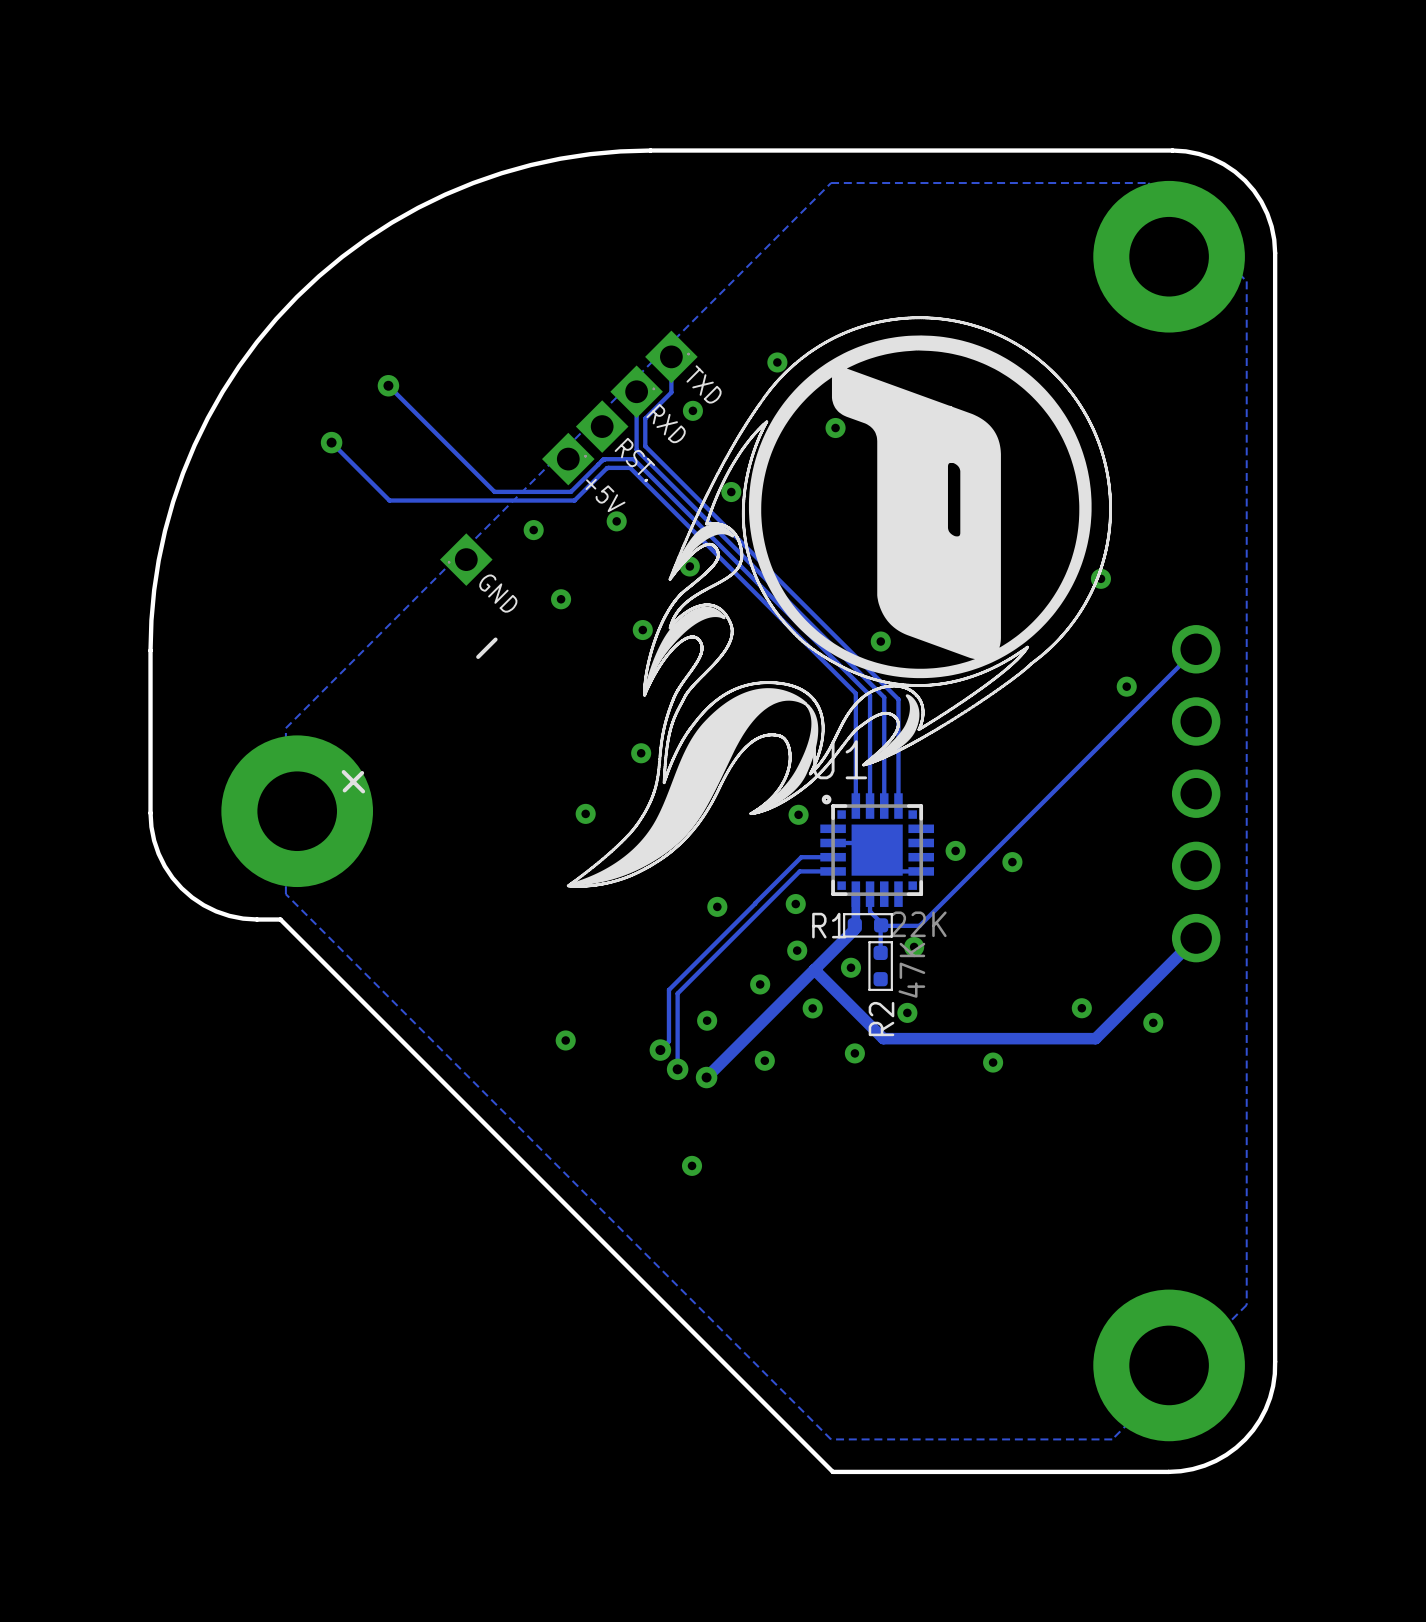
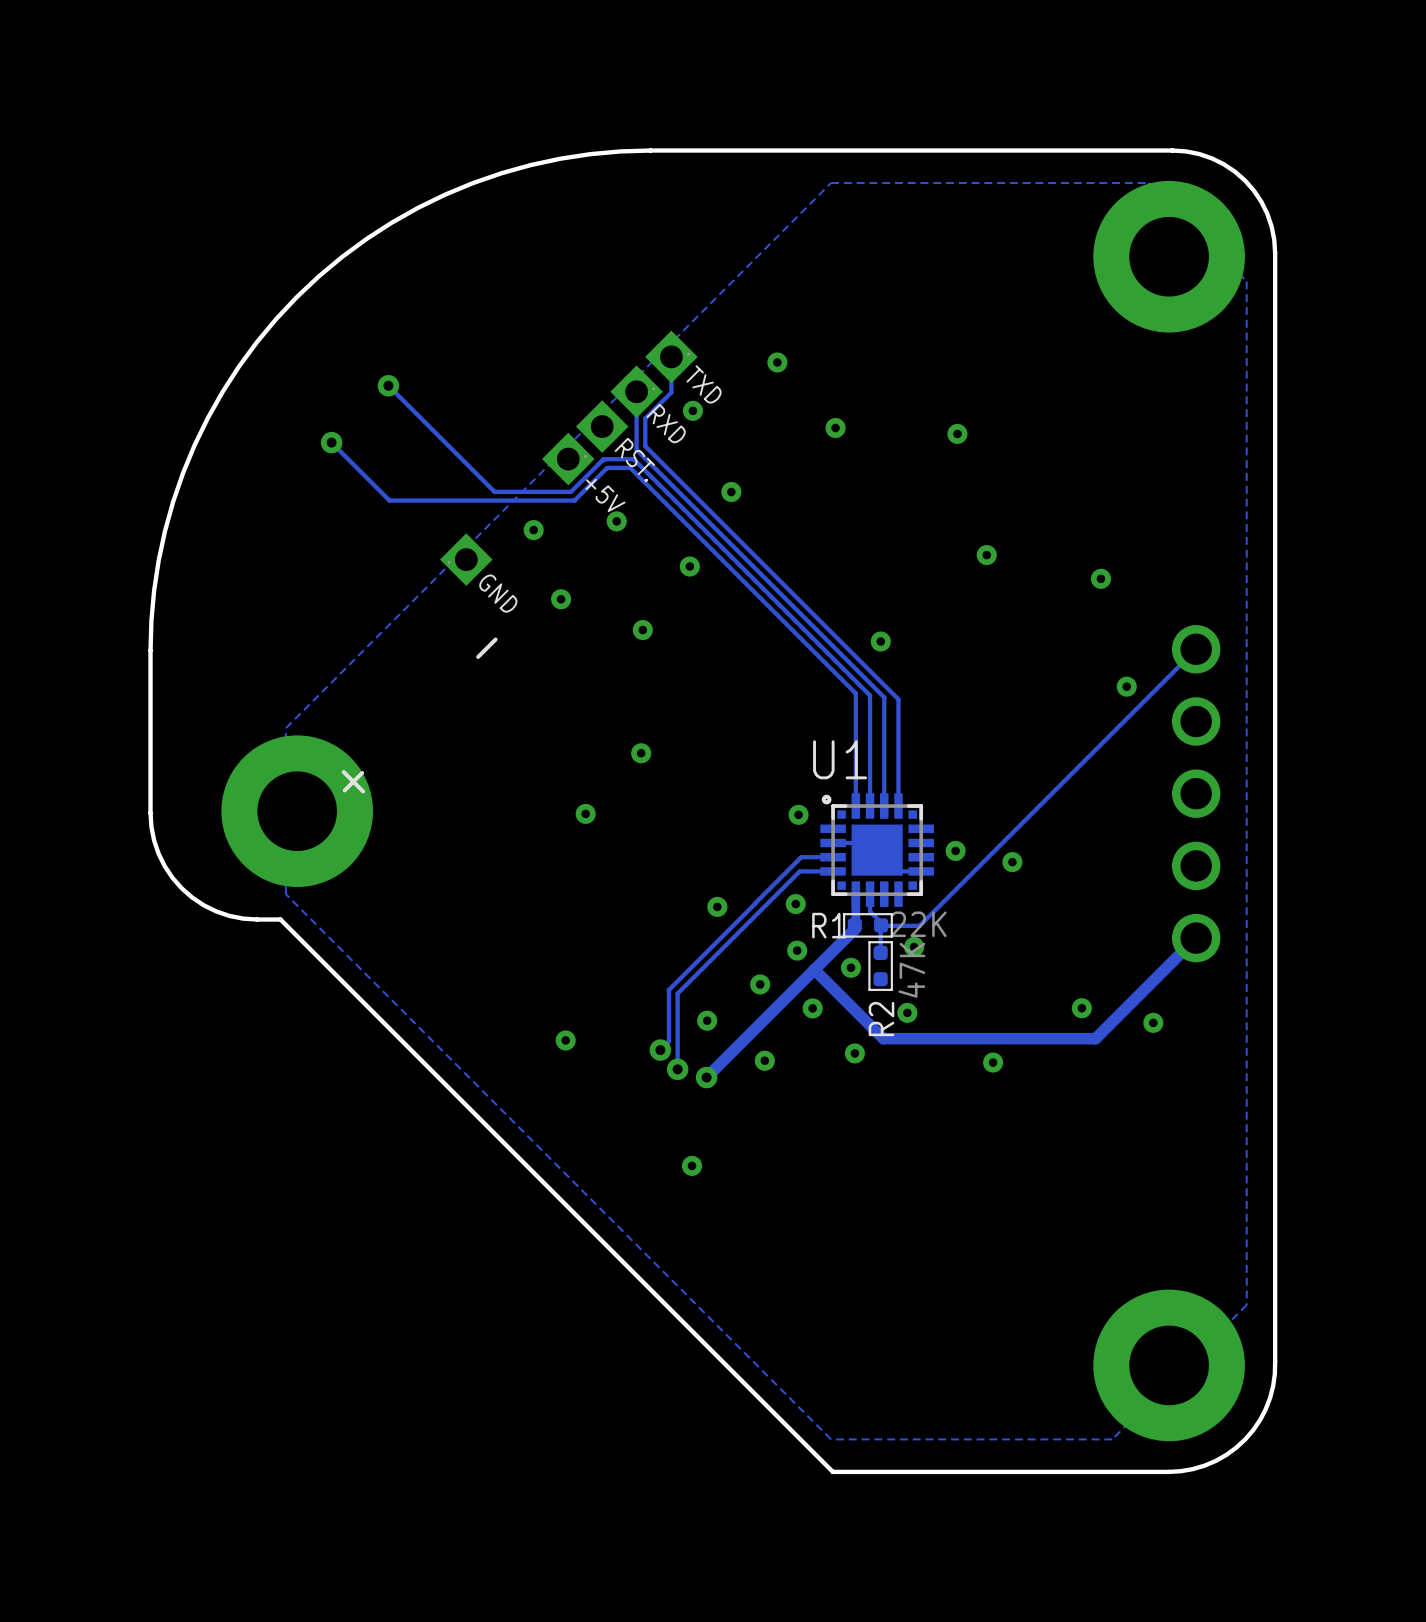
drawing: [566, 316, 1112, 888] -> none

